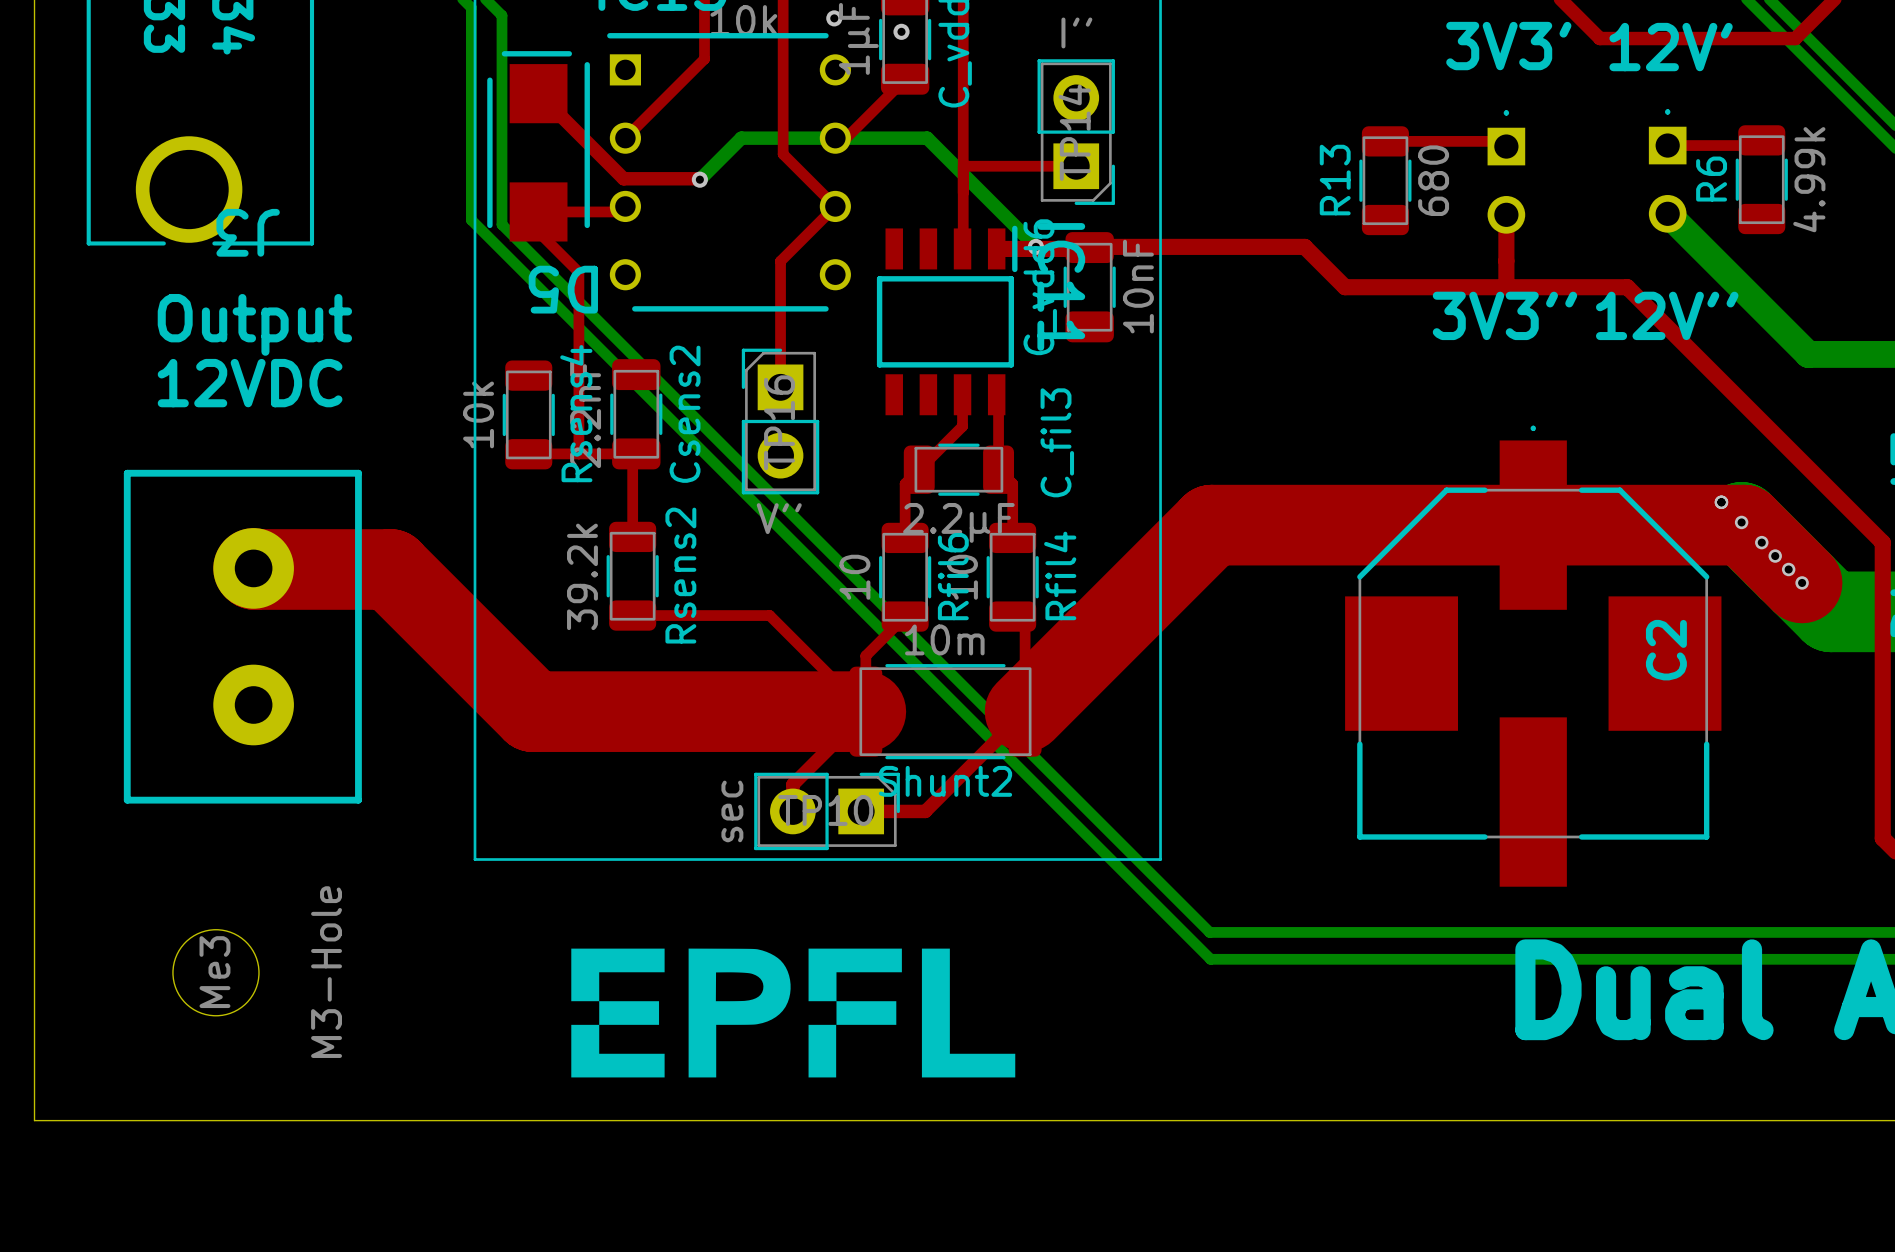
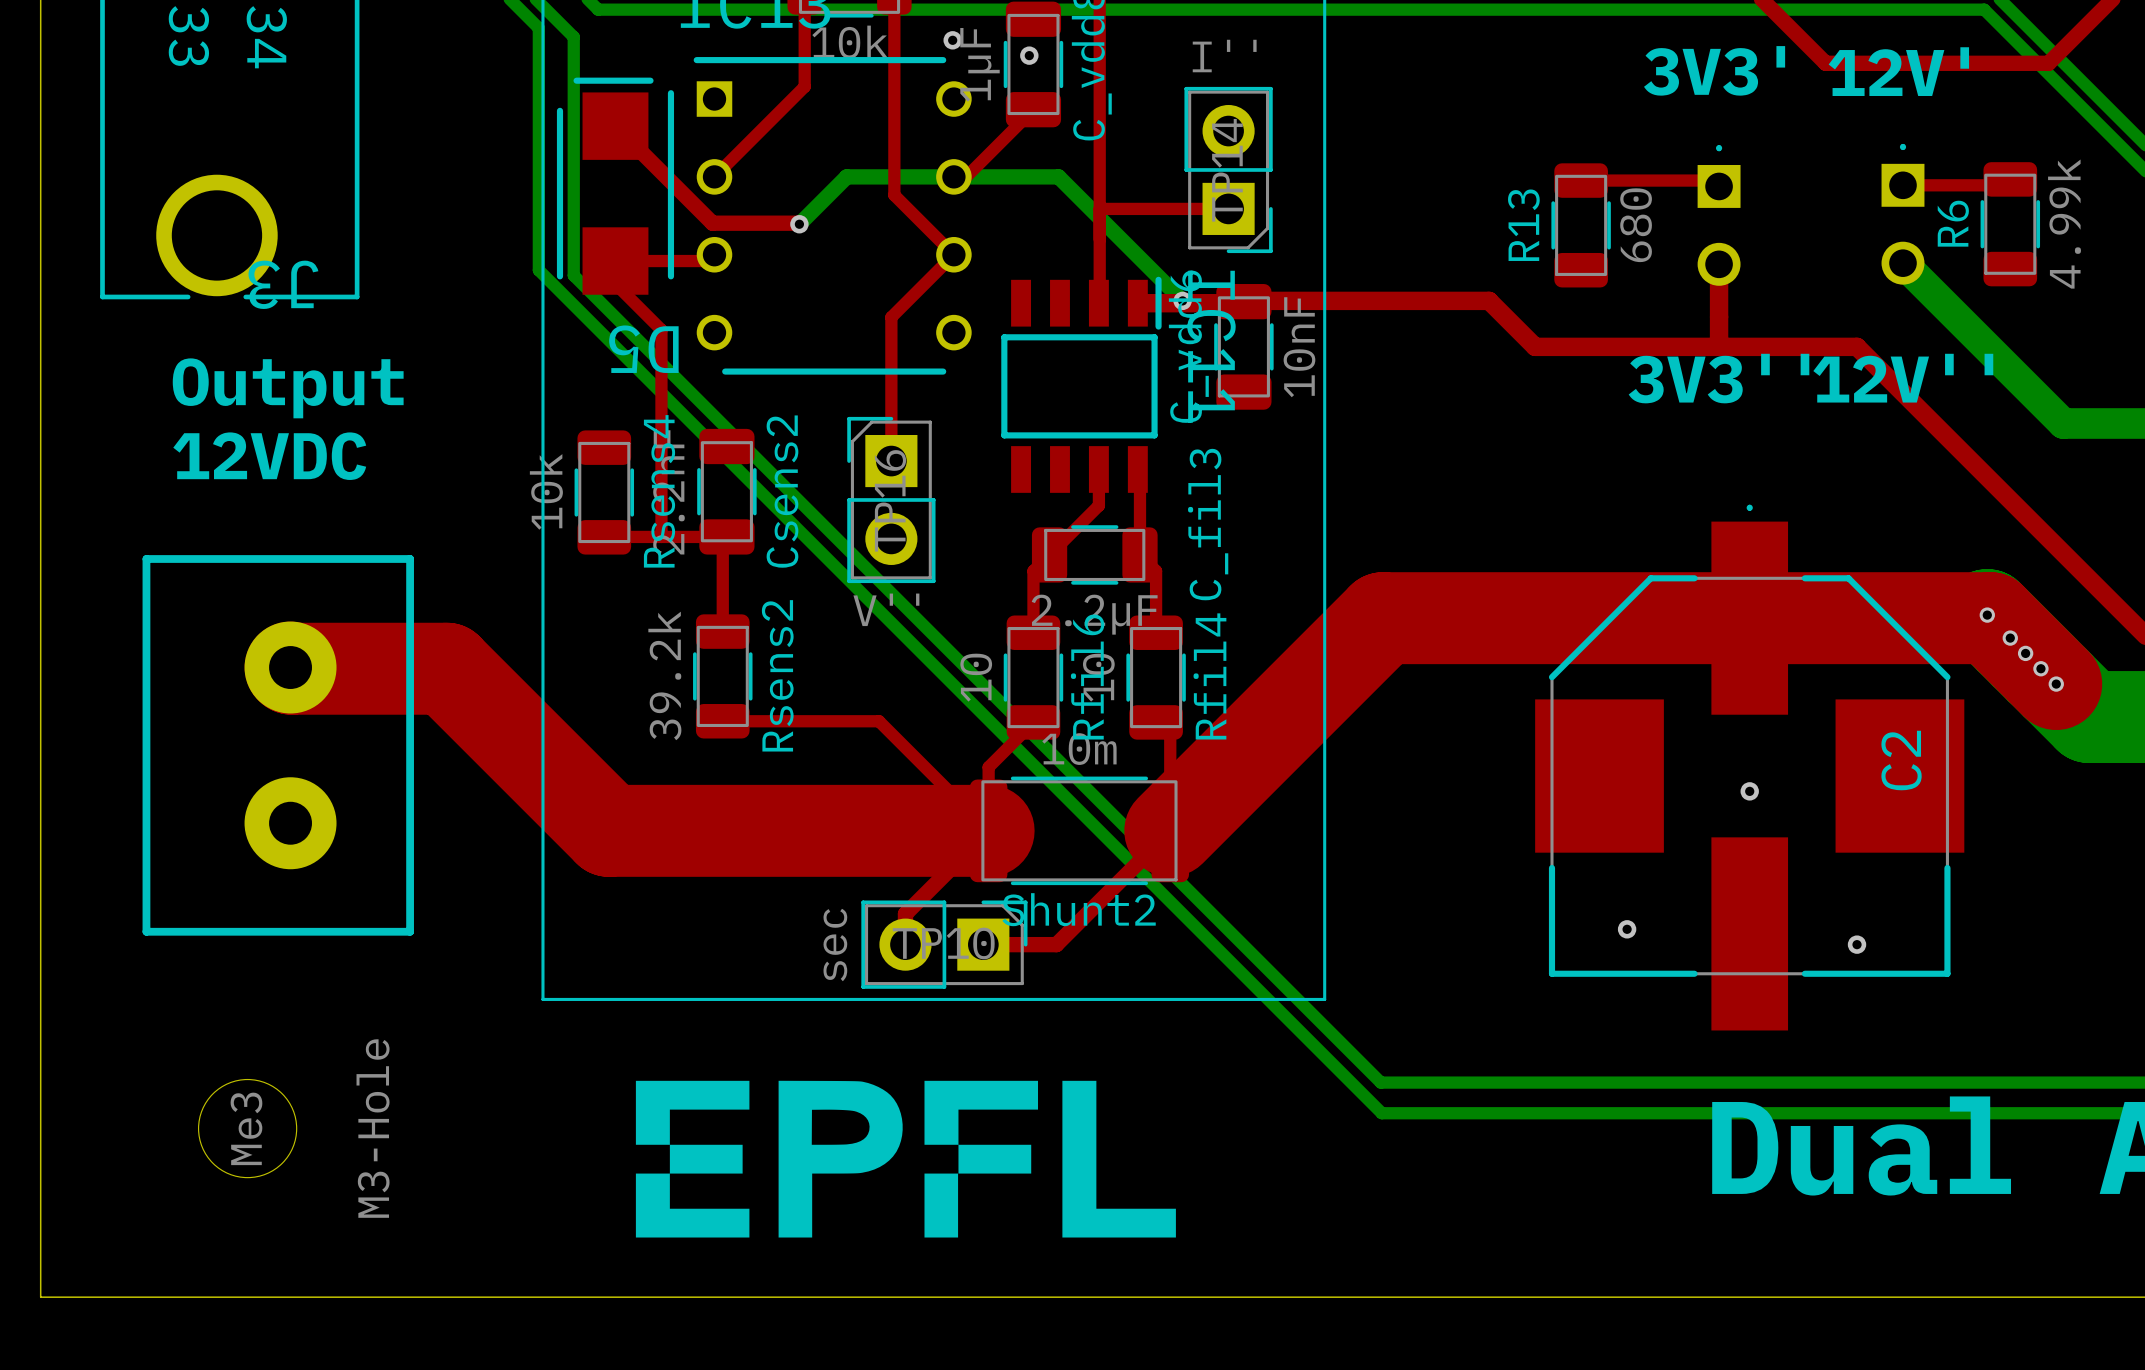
via: (1721, 502) -> none
via: none -> (1749, 791)
via: none -> (1627, 929)
via: none -> (1857, 944)
drawing shape: [571, 948, 1016, 1078] -> [635, 1080, 1176, 1238]

